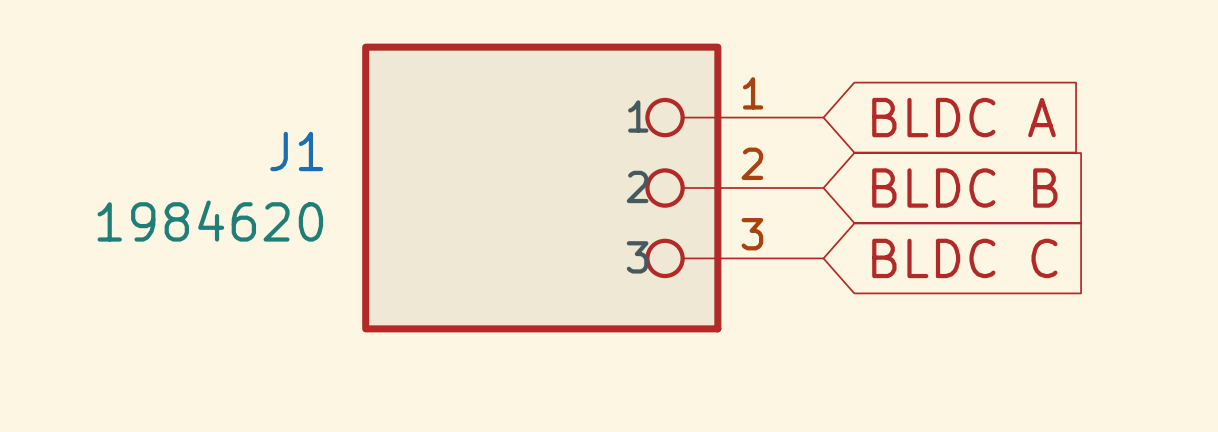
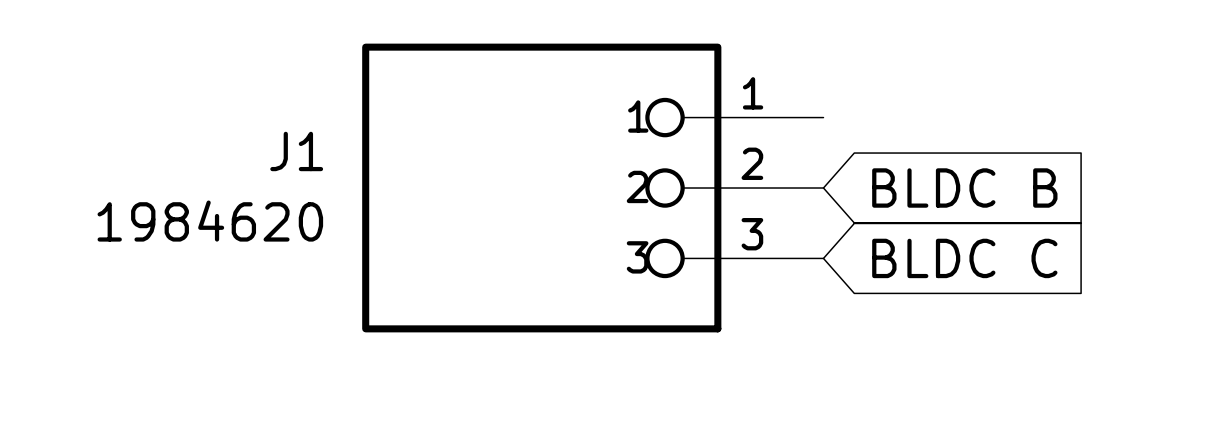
global label: BLDC A (963, 117) -> none

